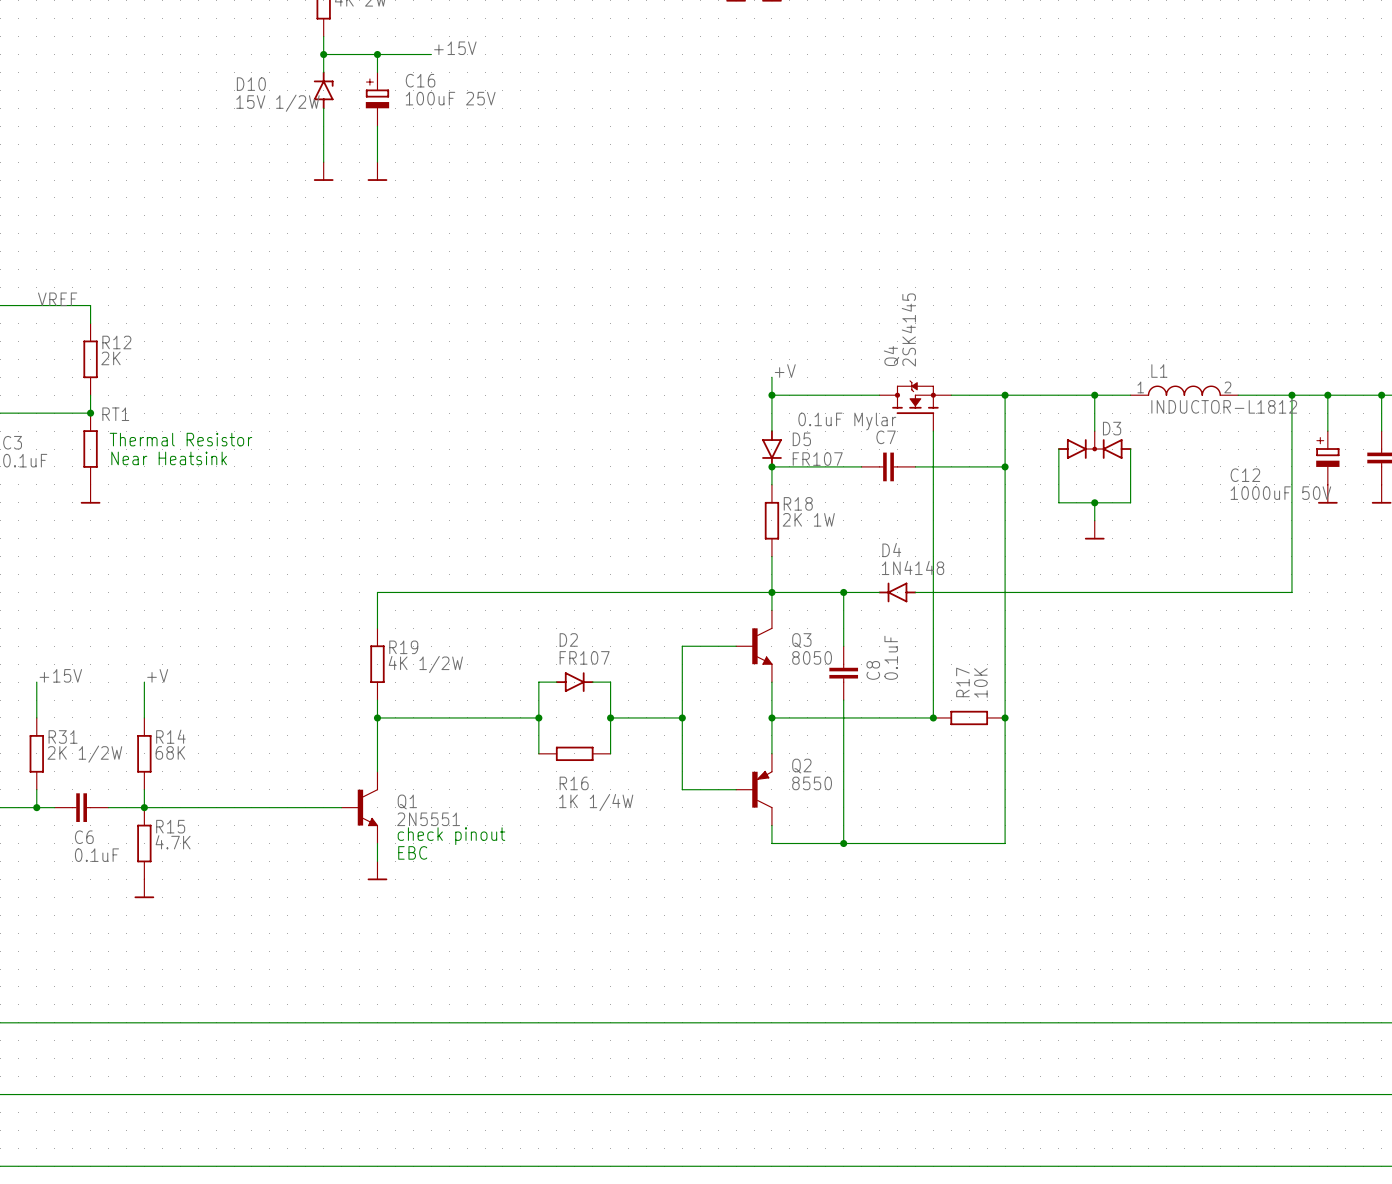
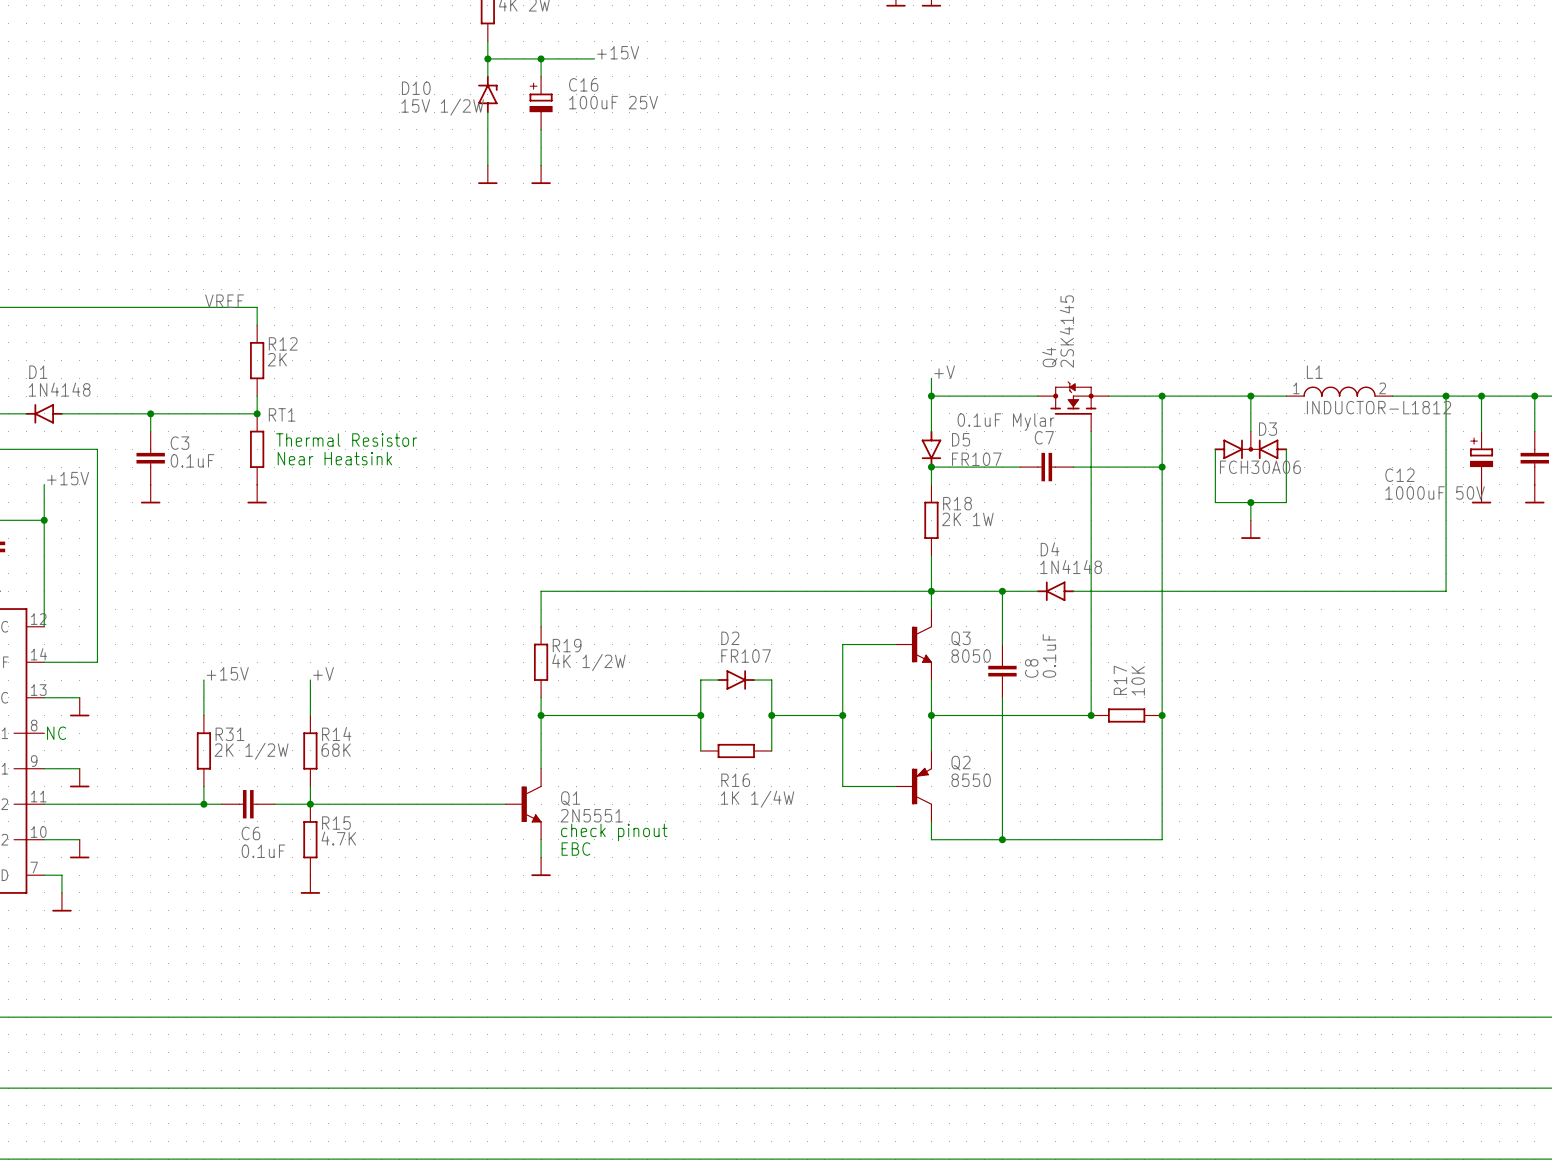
D3 value: none -> FCH30A06 (1260, 467)

